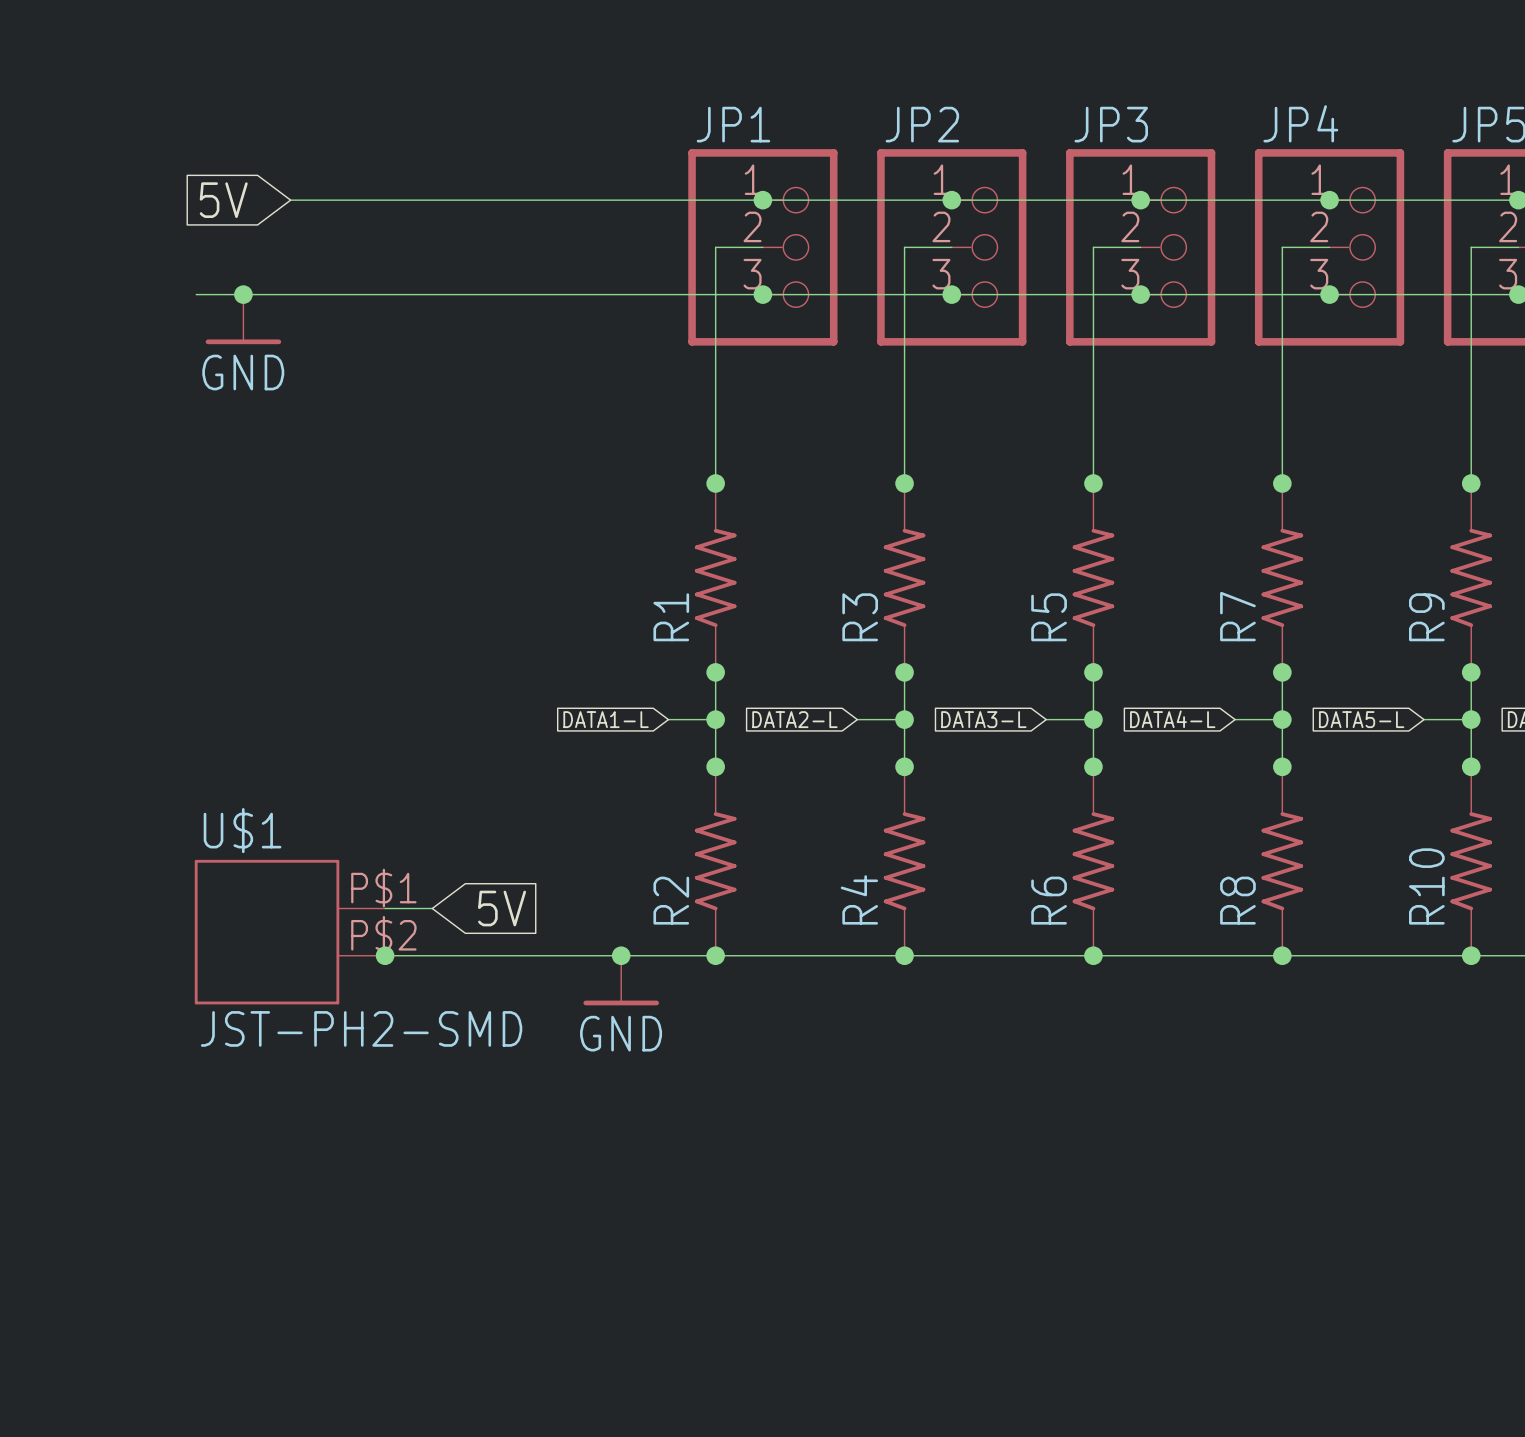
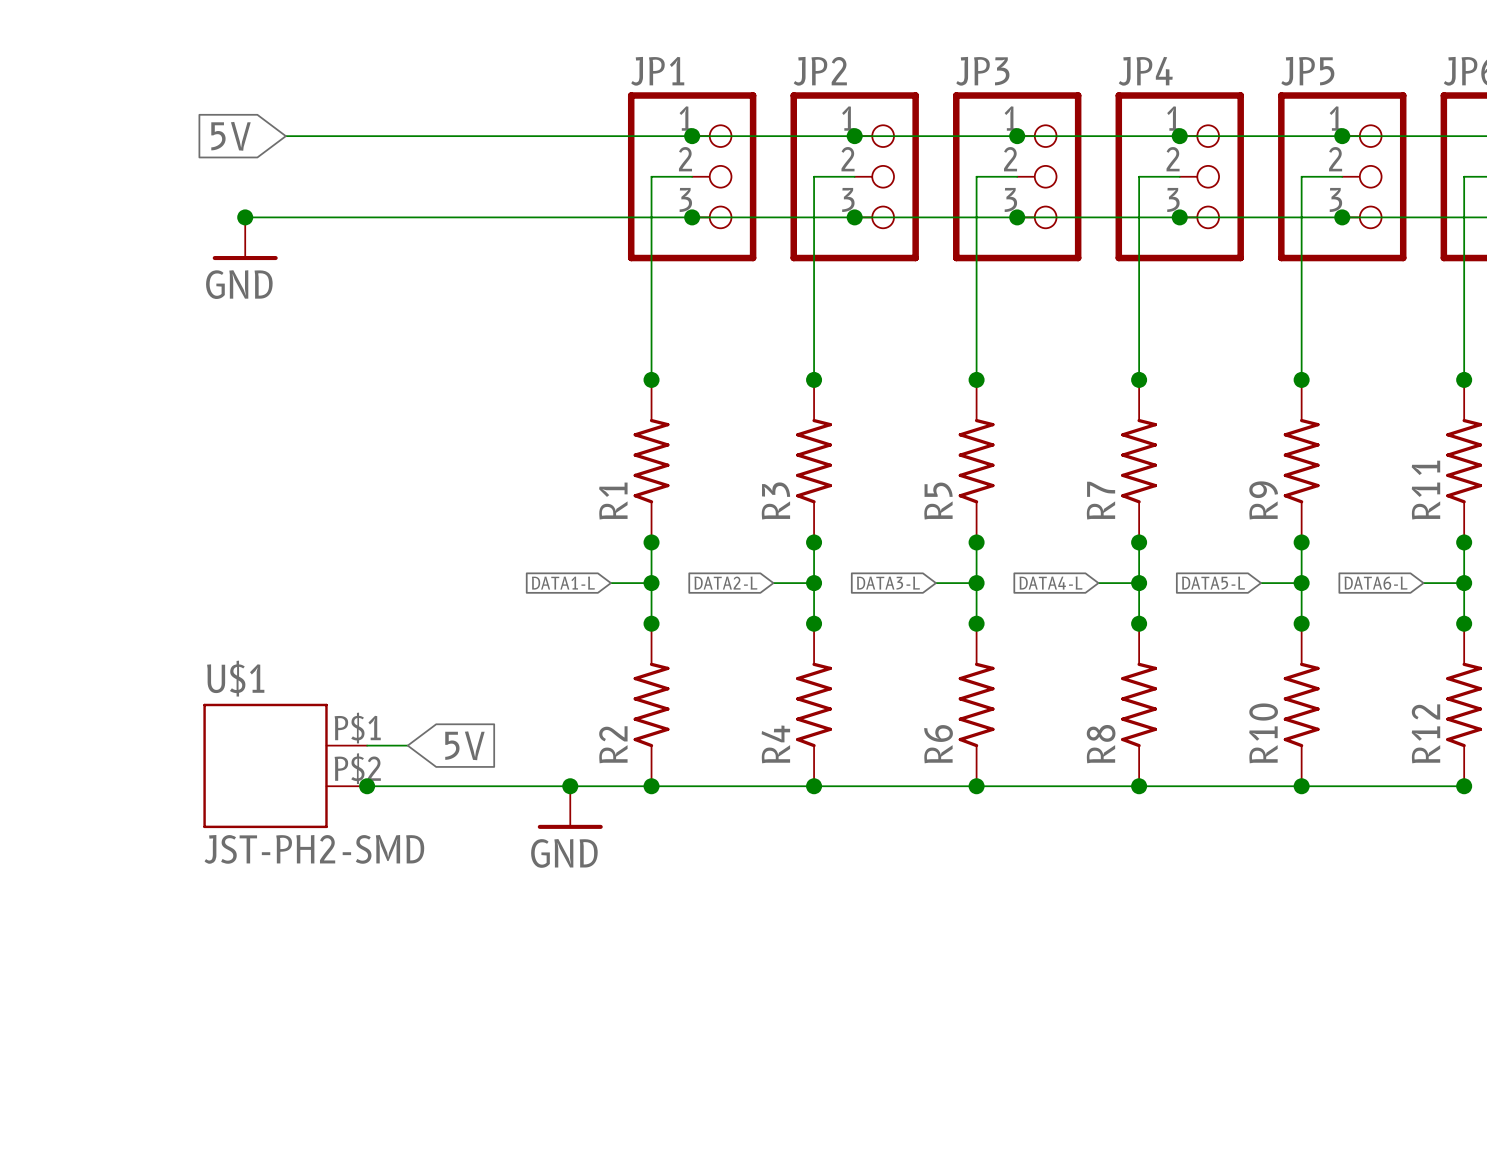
wire: (196, 294) (243, 294) -> none

